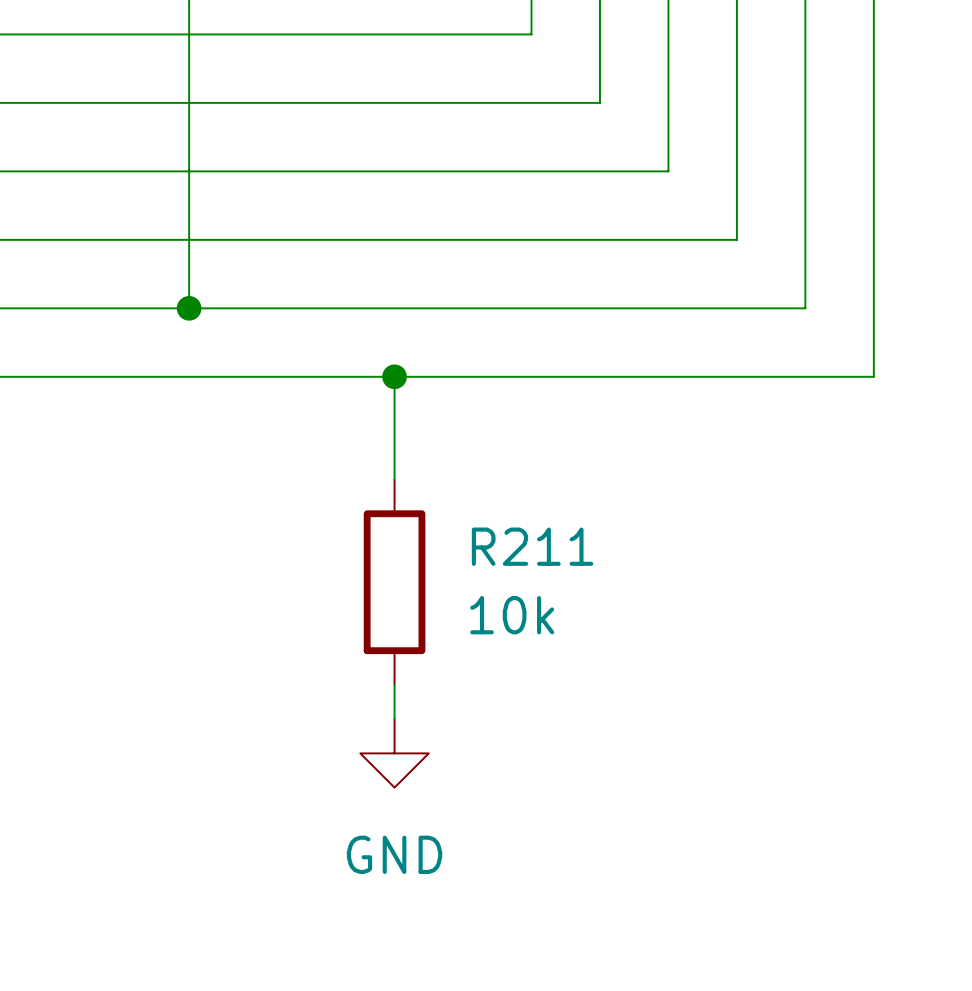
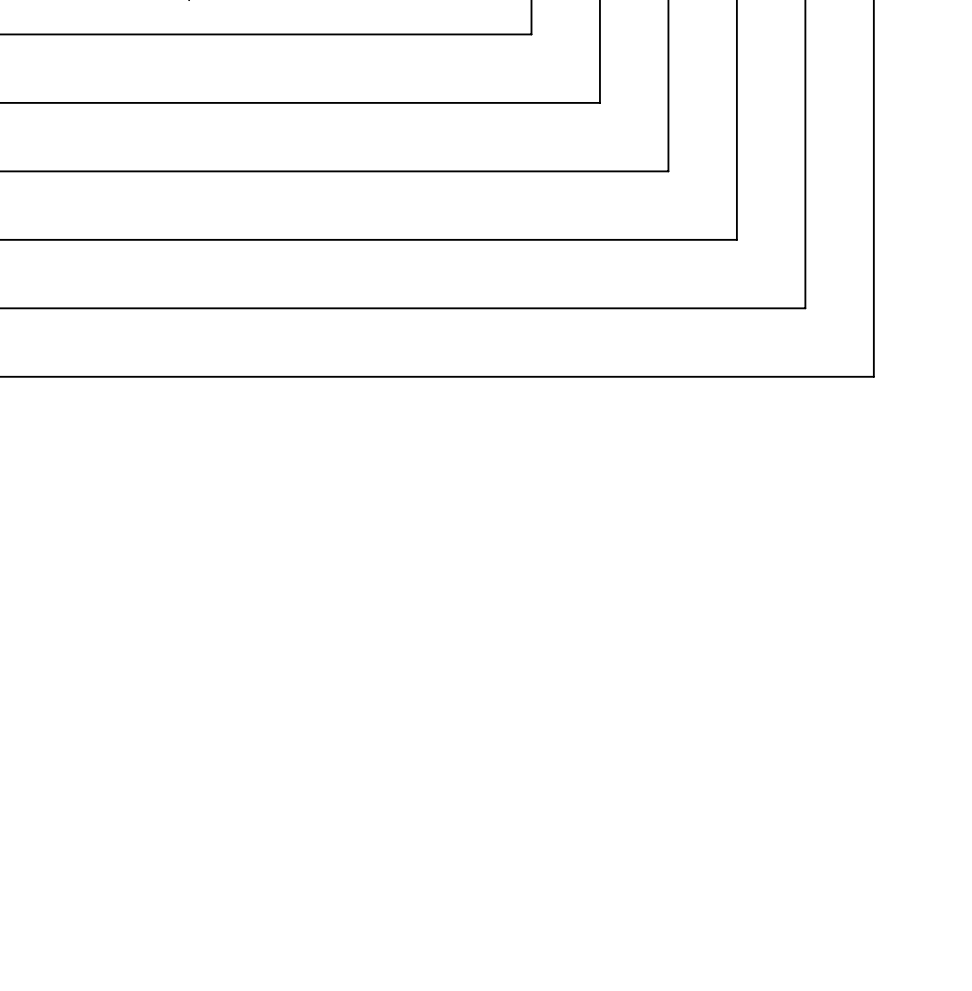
wire: (189, 0) (189, 308) -> none
junction: (189, 308) -> none
wire: (394, 376) (394, 479) -> none
junction: (394, 376) -> none
R211: 10k (394, 582) -> none
wire: (394, 684) (394, 719) -> none
power symbol: GND (394, 753) -> none

